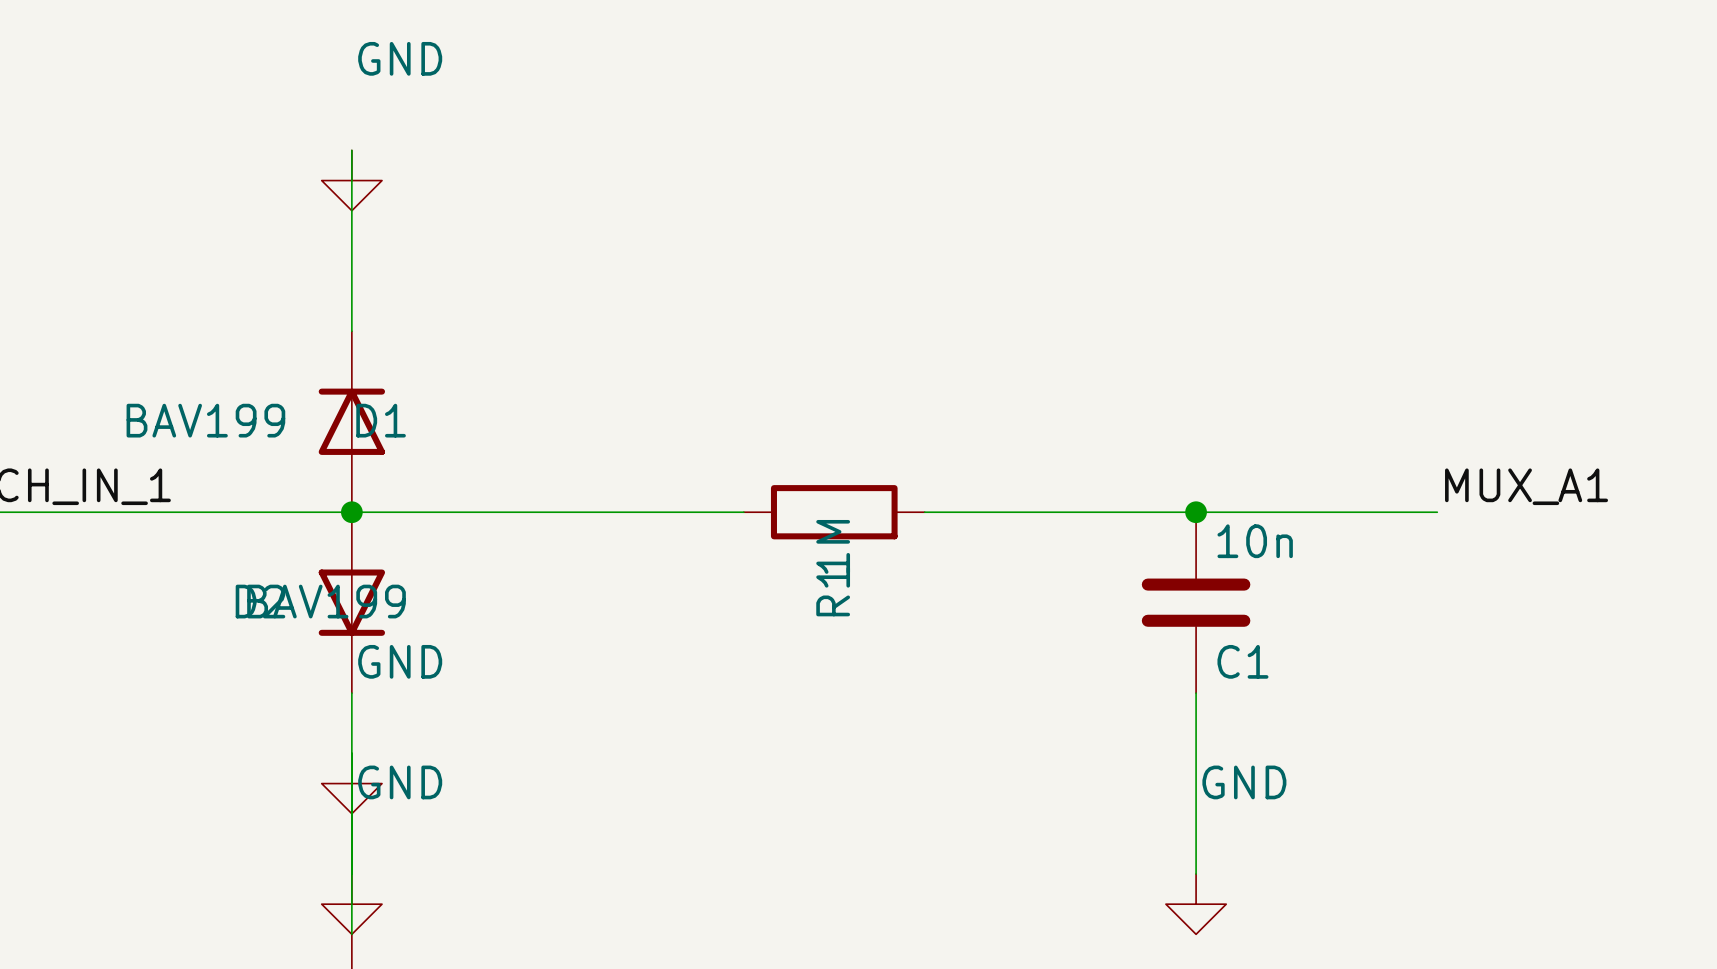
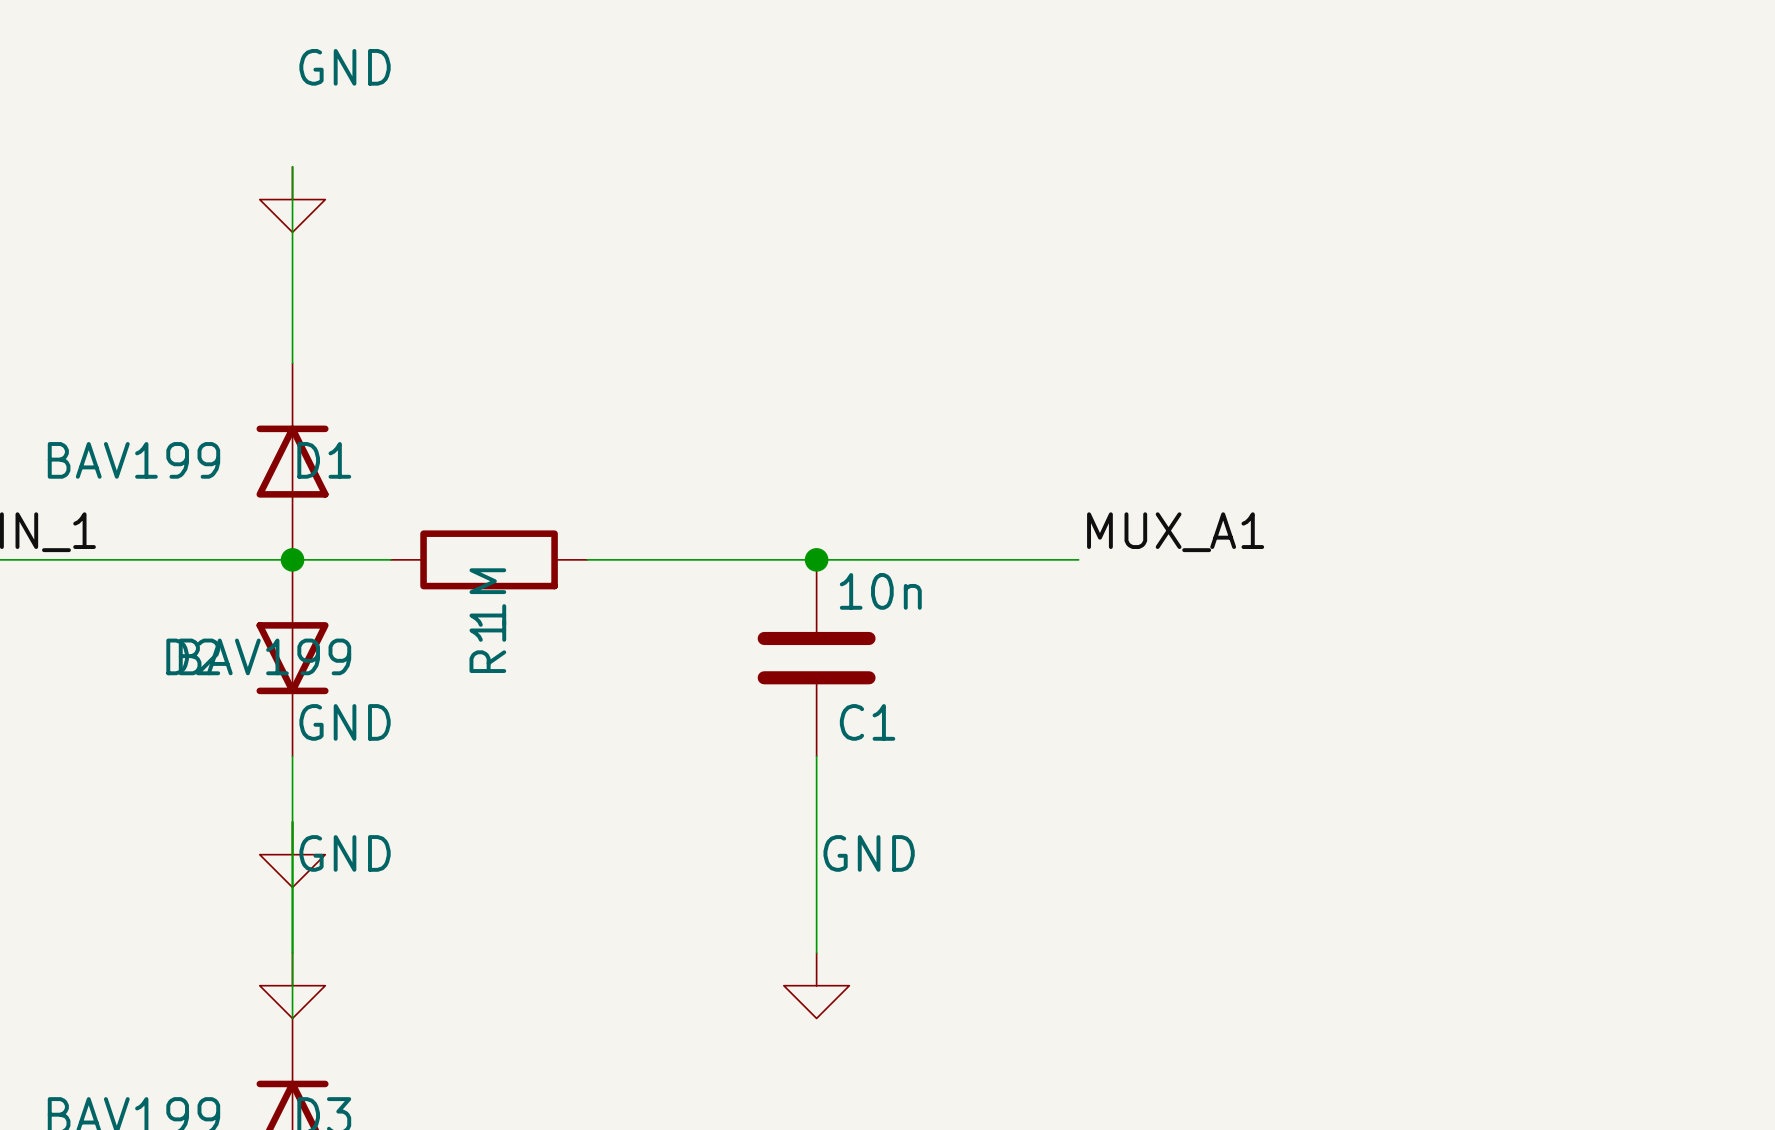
label position: MUX_A1 (1526, 486) -> MUX_A1 (1175, 532)
wire: (442, 512) (623, 512) -> (718, 559) (914, 559)
R1 position: (834, 512) -> (489, 559)
junction: none -> (816, 559)
wire: (1075, 512) (1437, 512) -> none
junction: (1196, 512) -> none
C1 position: (1196, 602) -> (816, 658)
wire: (1196, 693) (1196, 874) -> (816, 756) (816, 952)
power symbol position: GND (1196, 904) -> GND (816, 985)

